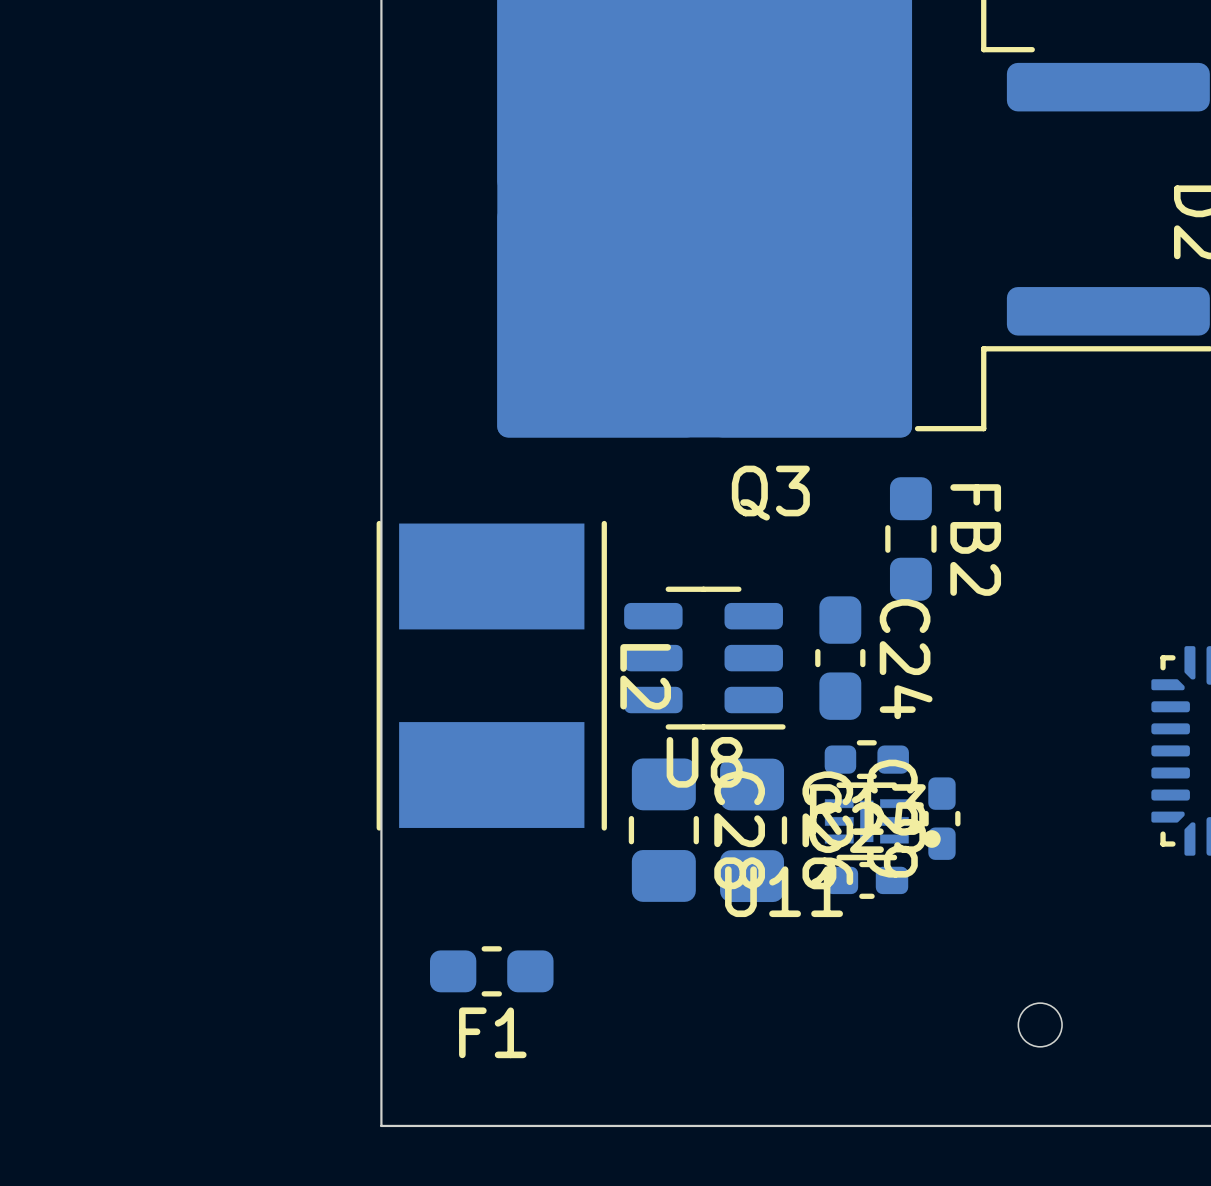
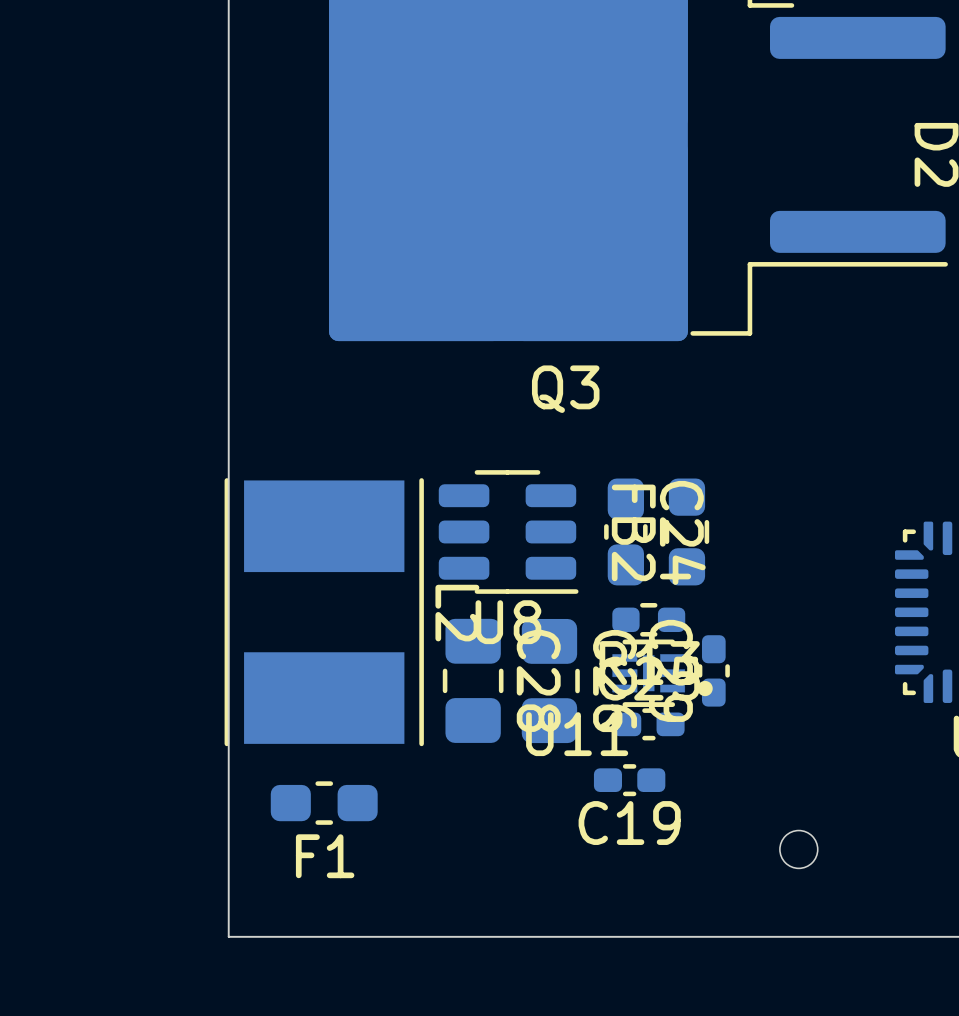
FB2 position: (910, 538) -> (686, 531)
FB2 name position: FB2 (975, 540) -> FB2 (633, 532)
L2 position: (491, 675) -> (324, 612)
C19: none -> (629, 780)

